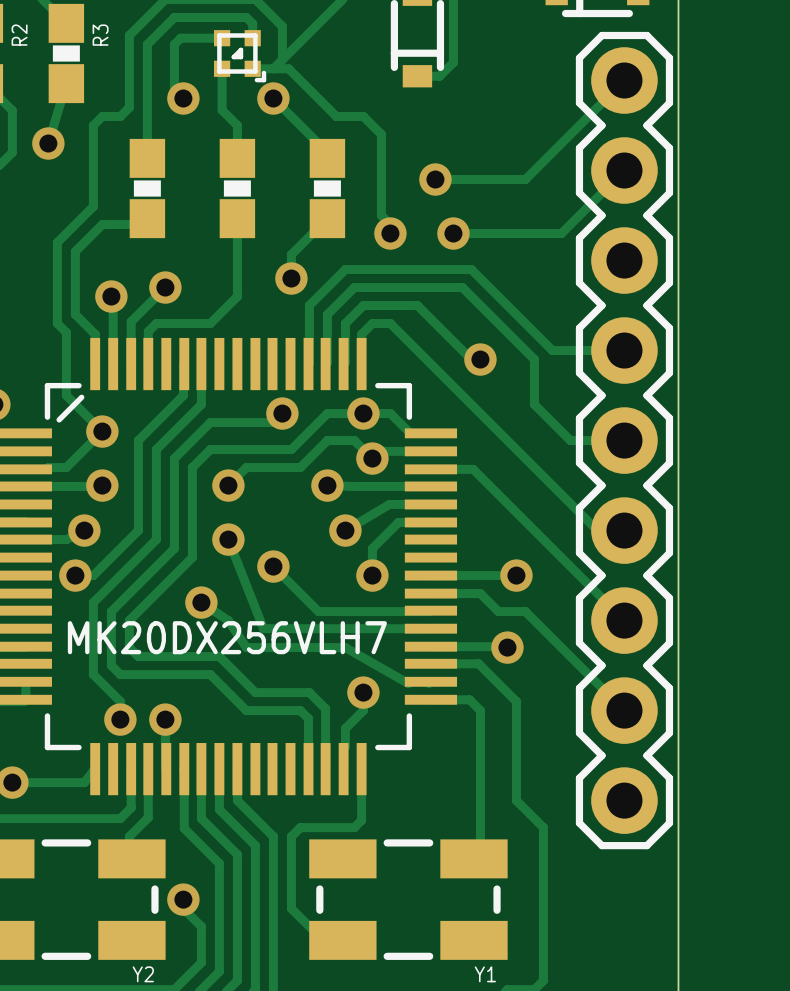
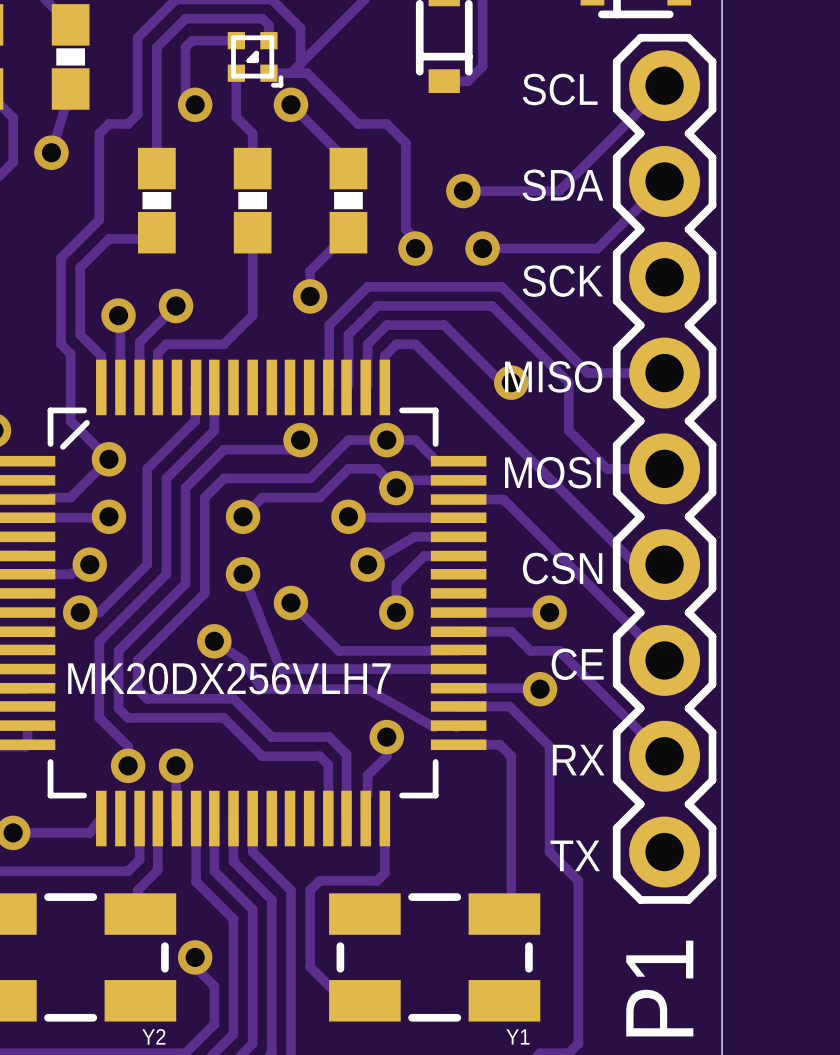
R2 name: R2 (19, 35) -> none
R3 name: R3 (100, 35) -> none
text: none -> SCL (560, 89)
text: none -> SDA (562, 185)
text: none -> SCK (562, 281)
text: none -> MISO (553, 376)
text: none -> MOSI (552, 472)
text: none -> CSN (562, 568)
text: none -> CE (577, 664)
text: none -> RX (578, 760)
text: none -> TX (575, 855)
text: none -> P1 (659, 988)

